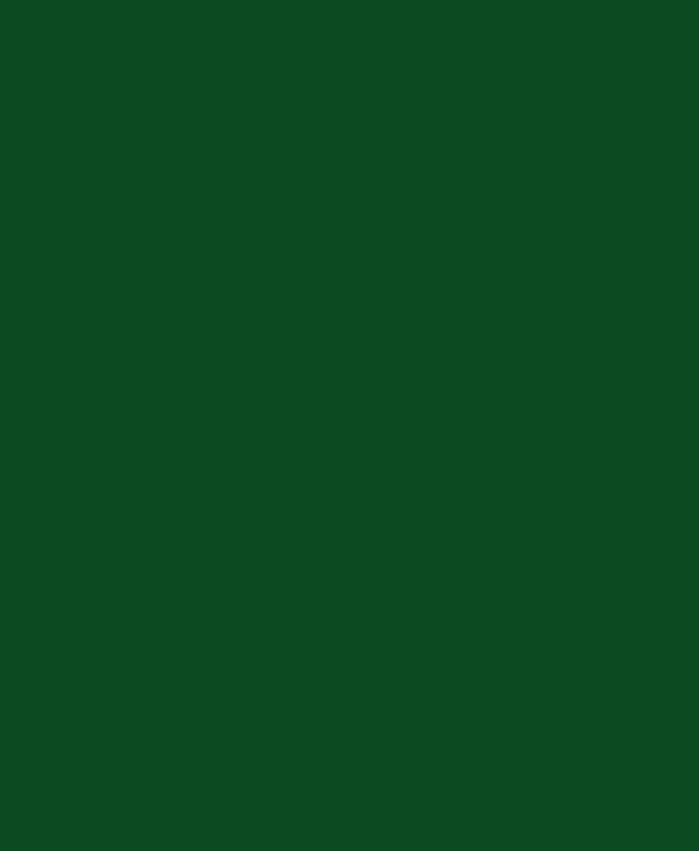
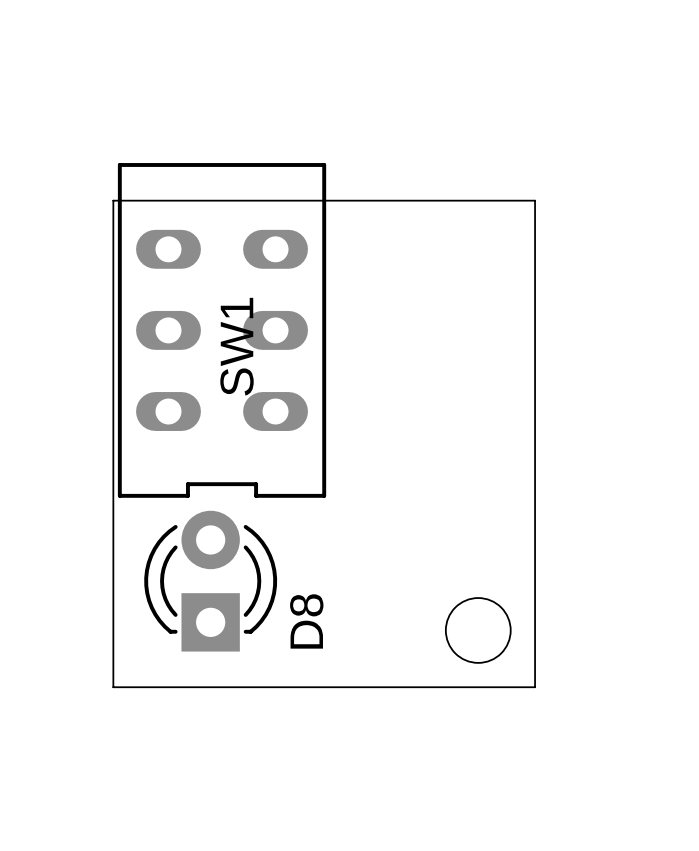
board edge: none -> (113, 200) (535, 200) (535, 687) (113, 687) (113, 200)
SW1: none -> (222, 330)
D8: none -> (210, 581)
round board edge: none -> [445, 597, 512, 664]

